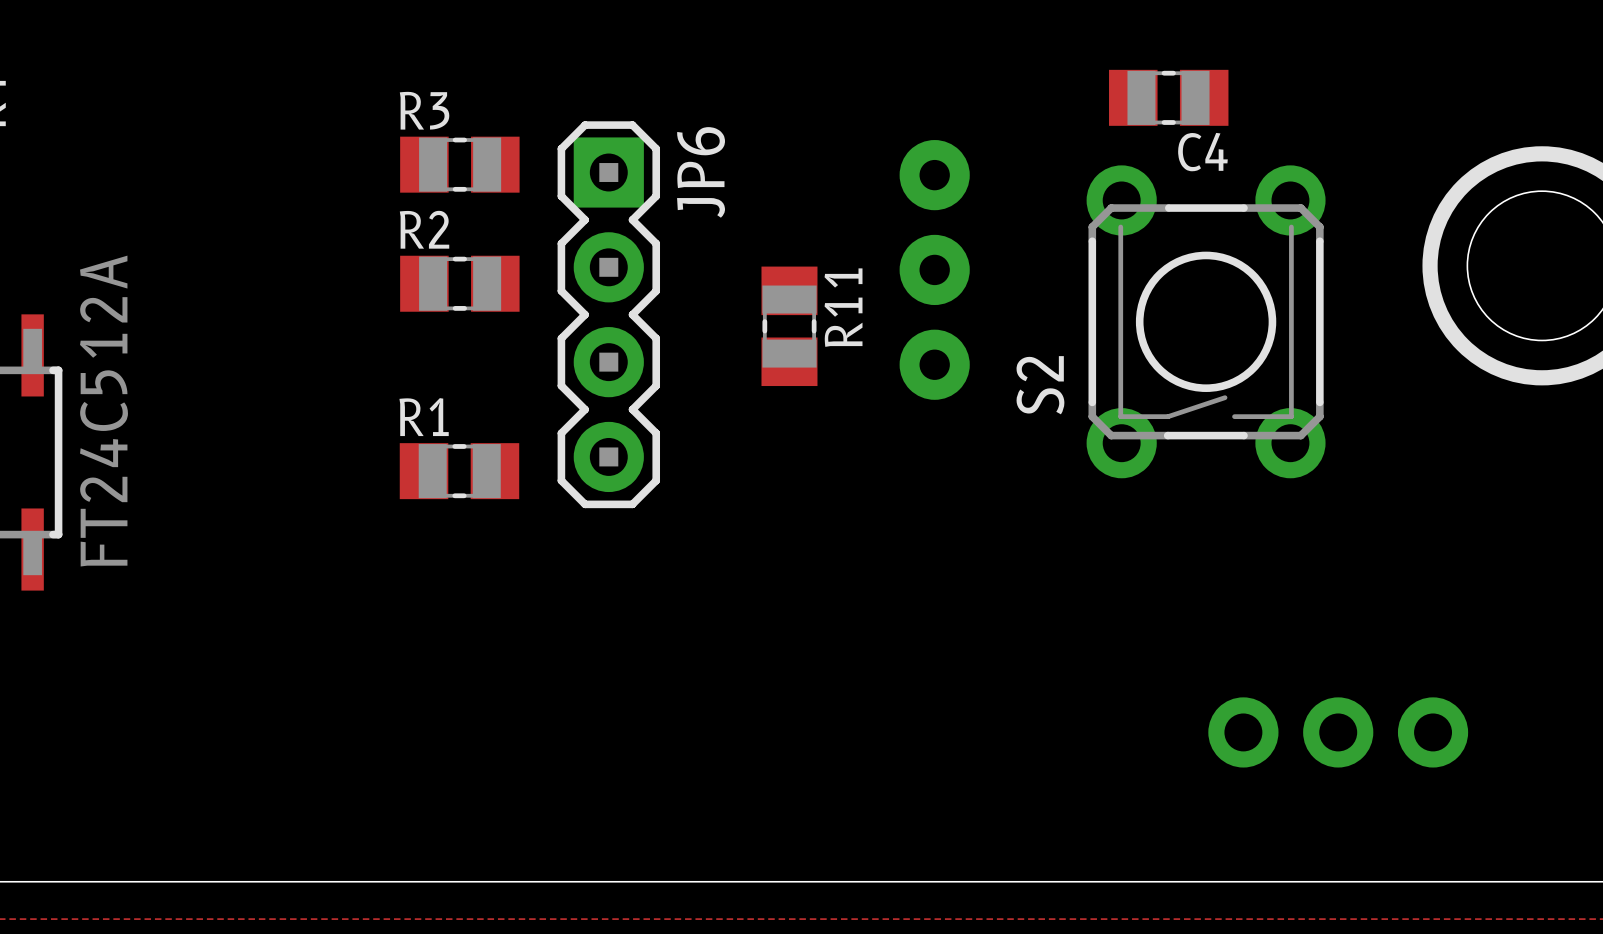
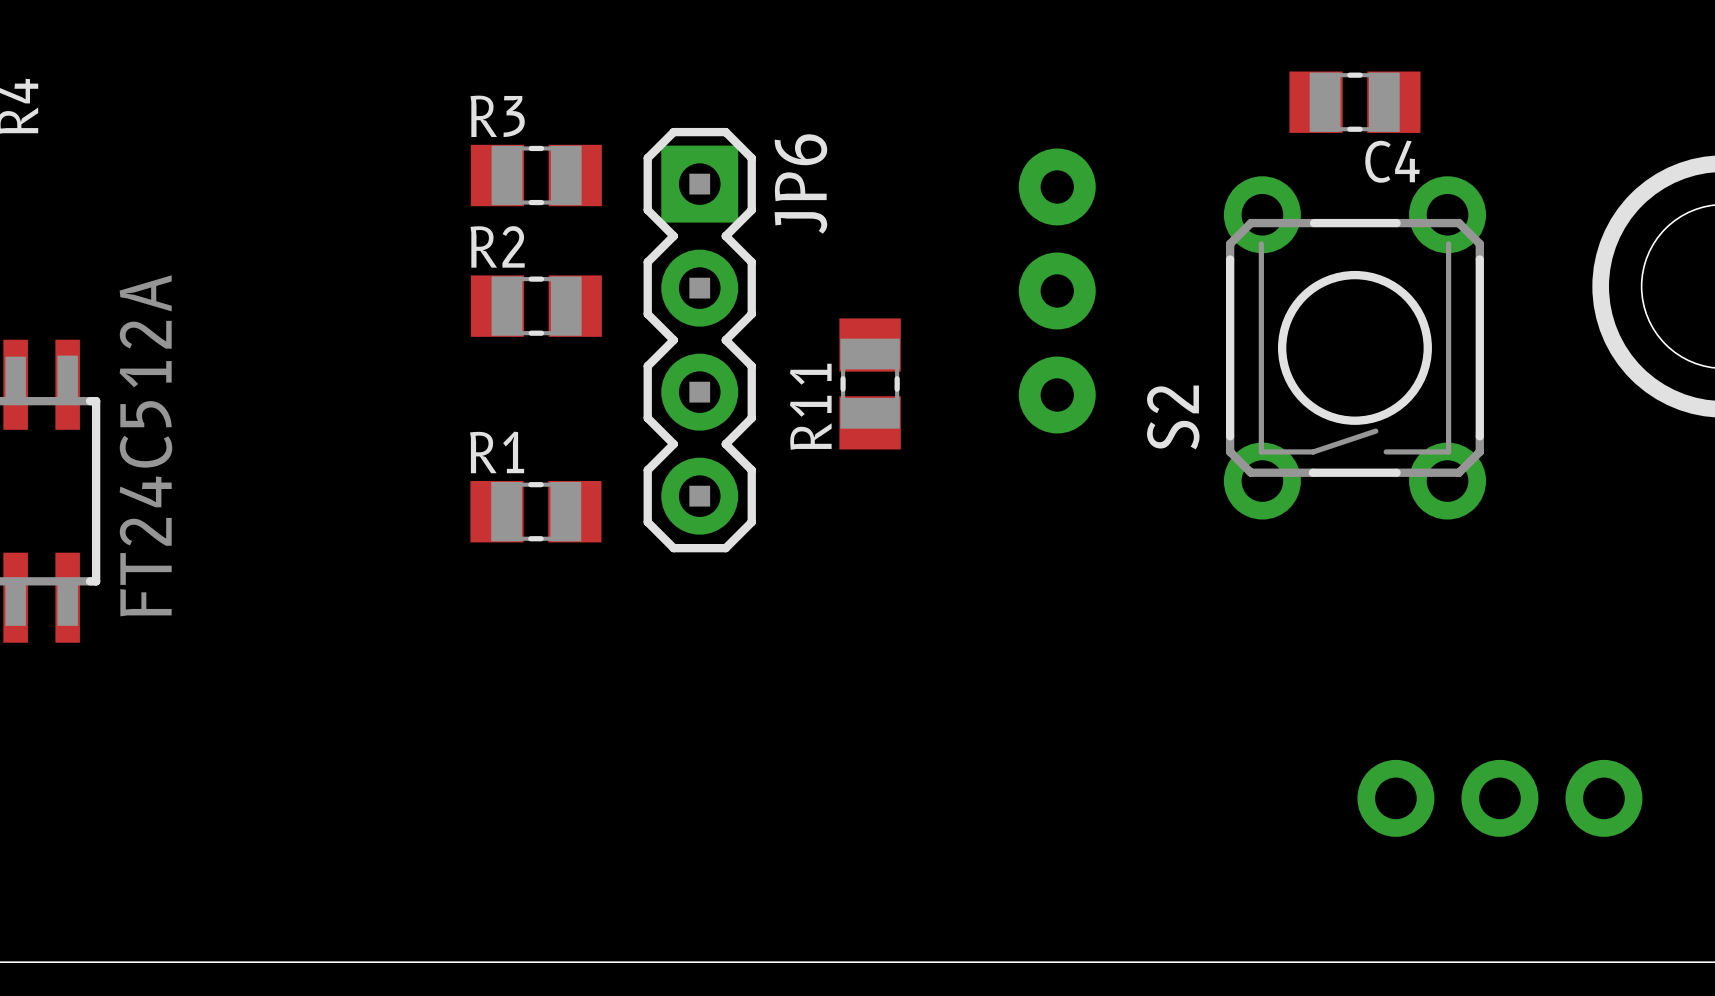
C4 position: (1168, 97) -> (1354, 102)
R11 rotation: 0° (789, 326) -> 180° (870, 383)

